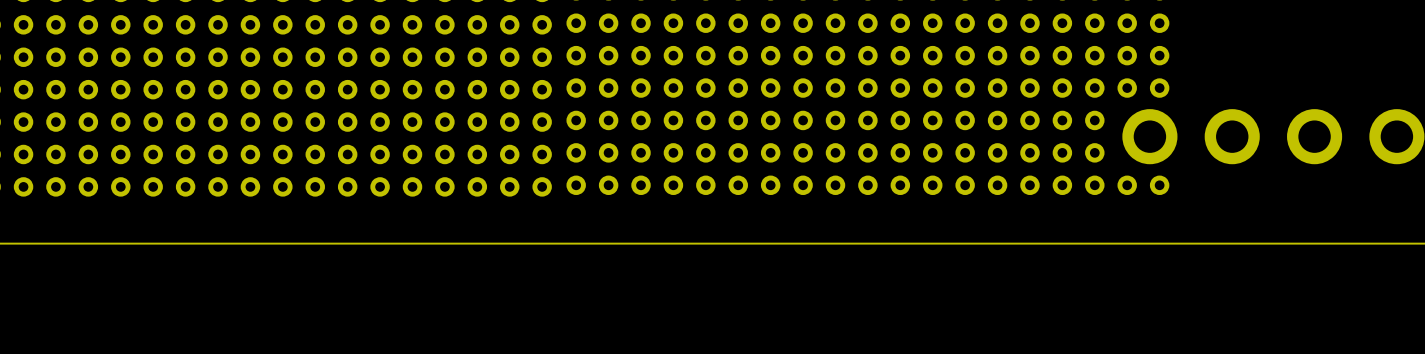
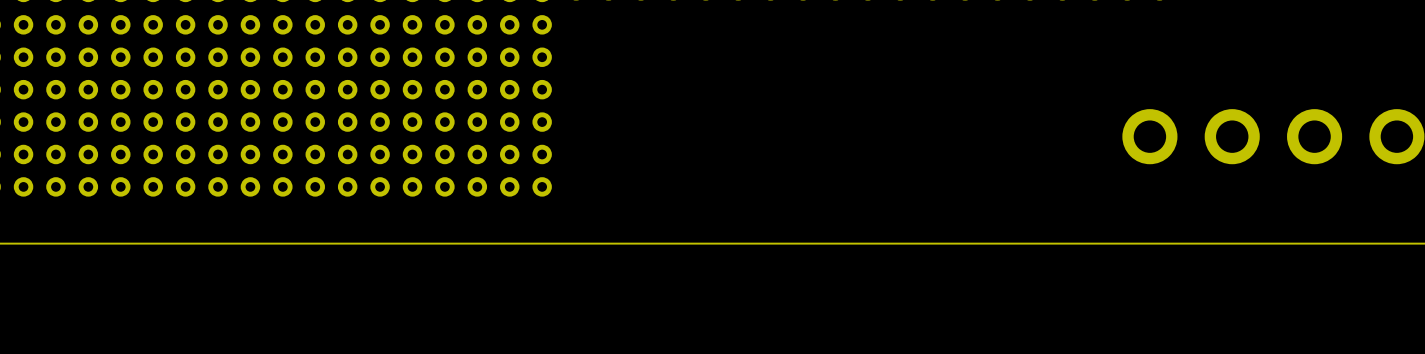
part: (576, 23) -> none
part: (608, 23) -> none
part: (641, 23) -> none
part: (673, 23) -> none
part: (705, 23) -> none
part: (738, 23) -> none
part: (770, 23) -> none
part: (803, 23) -> none
part: (835, 23) -> none
part: (867, 23) -> none
part: (900, 23) -> none
part: (932, 23) -> none
part: (965, 23) -> none
part: (997, 23) -> none
part: (1029, 23) -> none
part: (1062, 23) -> none
part: (1094, 23) -> none
part: (1127, 23) -> none
part: (1159, 23) -> none
part: (576, 55) -> none
part: (608, 55) -> none
part: (641, 55) -> none
part: (673, 55) -> none
part: (705, 55) -> none
part: (738, 55) -> none
part: (770, 55) -> none
part: (803, 55) -> none
part: (835, 55) -> none
part: (867, 55) -> none
part: (900, 55) -> none
part: (932, 55) -> none
part: (965, 55) -> none
part: (997, 55) -> none
part: (1029, 55) -> none
part: (1062, 55) -> none
part: (1094, 55) -> none
part: (1127, 55) -> none
part: (1159, 55) -> none
part: (576, 88) -> none
part: (608, 88) -> none
part: (641, 88) -> none
part: (673, 88) -> none
part: (705, 88) -> none
part: (738, 88) -> none
part: (770, 88) -> none
part: (803, 88) -> none
part: (835, 88) -> none
part: (867, 88) -> none
part: (900, 88) -> none
part: (932, 88) -> none
part: (965, 88) -> none
part: (997, 88) -> none
part: (1029, 88) -> none
part: (1062, 88) -> none
part: (1094, 88) -> none
part: (1127, 88) -> none
part: (1159, 88) -> none
part: (576, 120) -> none
part: (608, 120) -> none
part: (641, 120) -> none
part: (673, 120) -> none
part: (705, 120) -> none
part: (738, 120) -> none
part: (770, 120) -> none
part: (803, 120) -> none
part: (835, 120) -> none
part: (867, 120) -> none
part: (900, 120) -> none
part: (932, 120) -> none
part: (965, 120) -> none
part: (997, 120) -> none
part: (1029, 120) -> none
part: (1062, 120) -> none
part: (1094, 120) -> none
part: (576, 152) -> none
part: (608, 152) -> none
part: (641, 152) -> none
part: (673, 152) -> none
part: (705, 152) -> none
part: (738, 152) -> none
part: (770, 152) -> none
part: (803, 152) -> none
part: (835, 152) -> none
part: (867, 152) -> none
part: (900, 152) -> none
part: (932, 152) -> none
part: (965, 152) -> none
part: (997, 152) -> none
part: (1029, 152) -> none
part: (1062, 152) -> none
part: (1094, 152) -> none
part: (576, 185) -> none
part: (608, 185) -> none
part: (641, 185) -> none
part: (673, 185) -> none
part: (705, 185) -> none
part: (738, 185) -> none
part: (770, 185) -> none
part: (803, 185) -> none
part: (835, 185) -> none
part: (867, 185) -> none
part: (900, 185) -> none
part: (932, 185) -> none
part: (965, 185) -> none
part: (997, 185) -> none
part: (1029, 185) -> none
part: (1062, 185) -> none
part: (1094, 185) -> none
part: (1127, 185) -> none
part: (1159, 185) -> none

